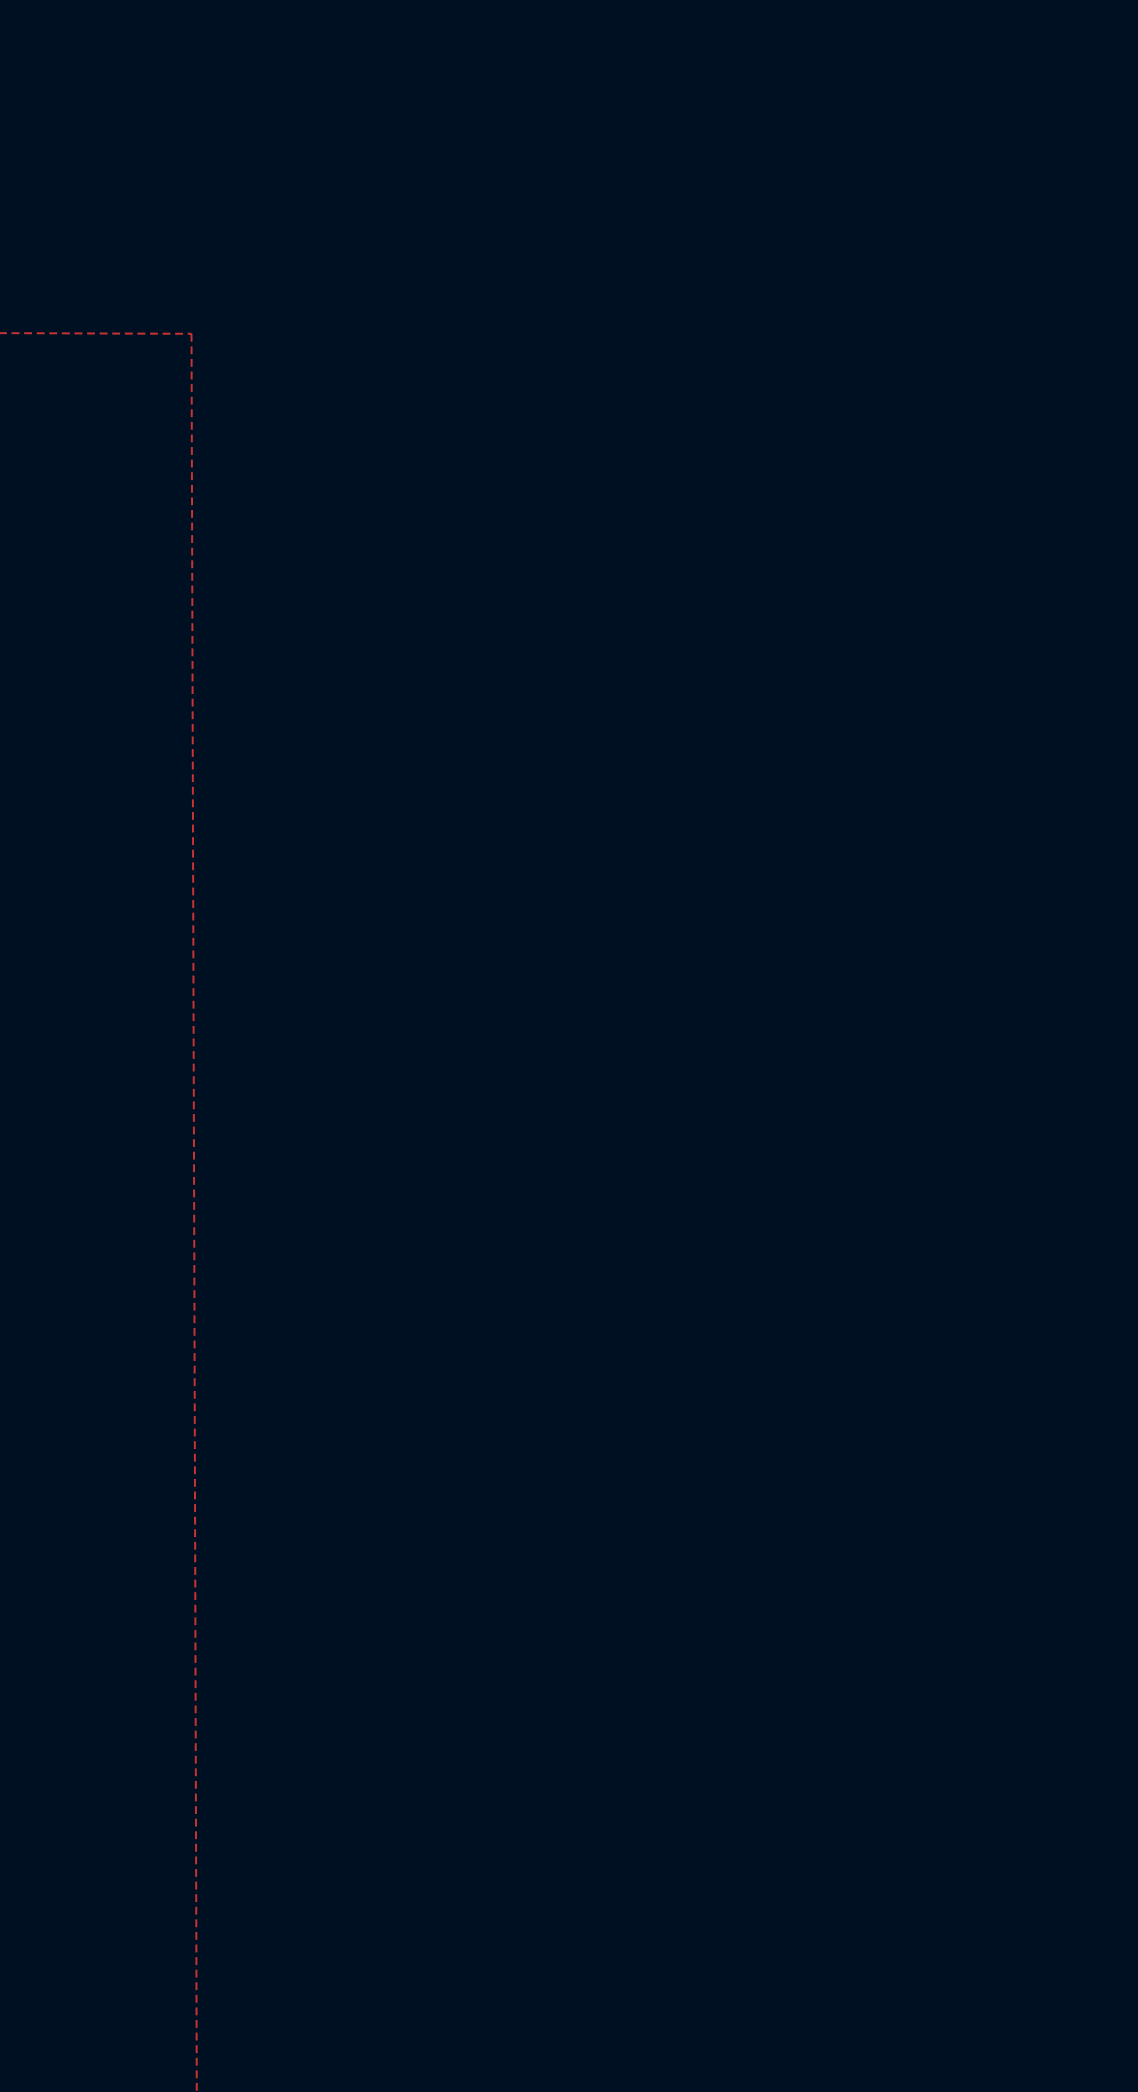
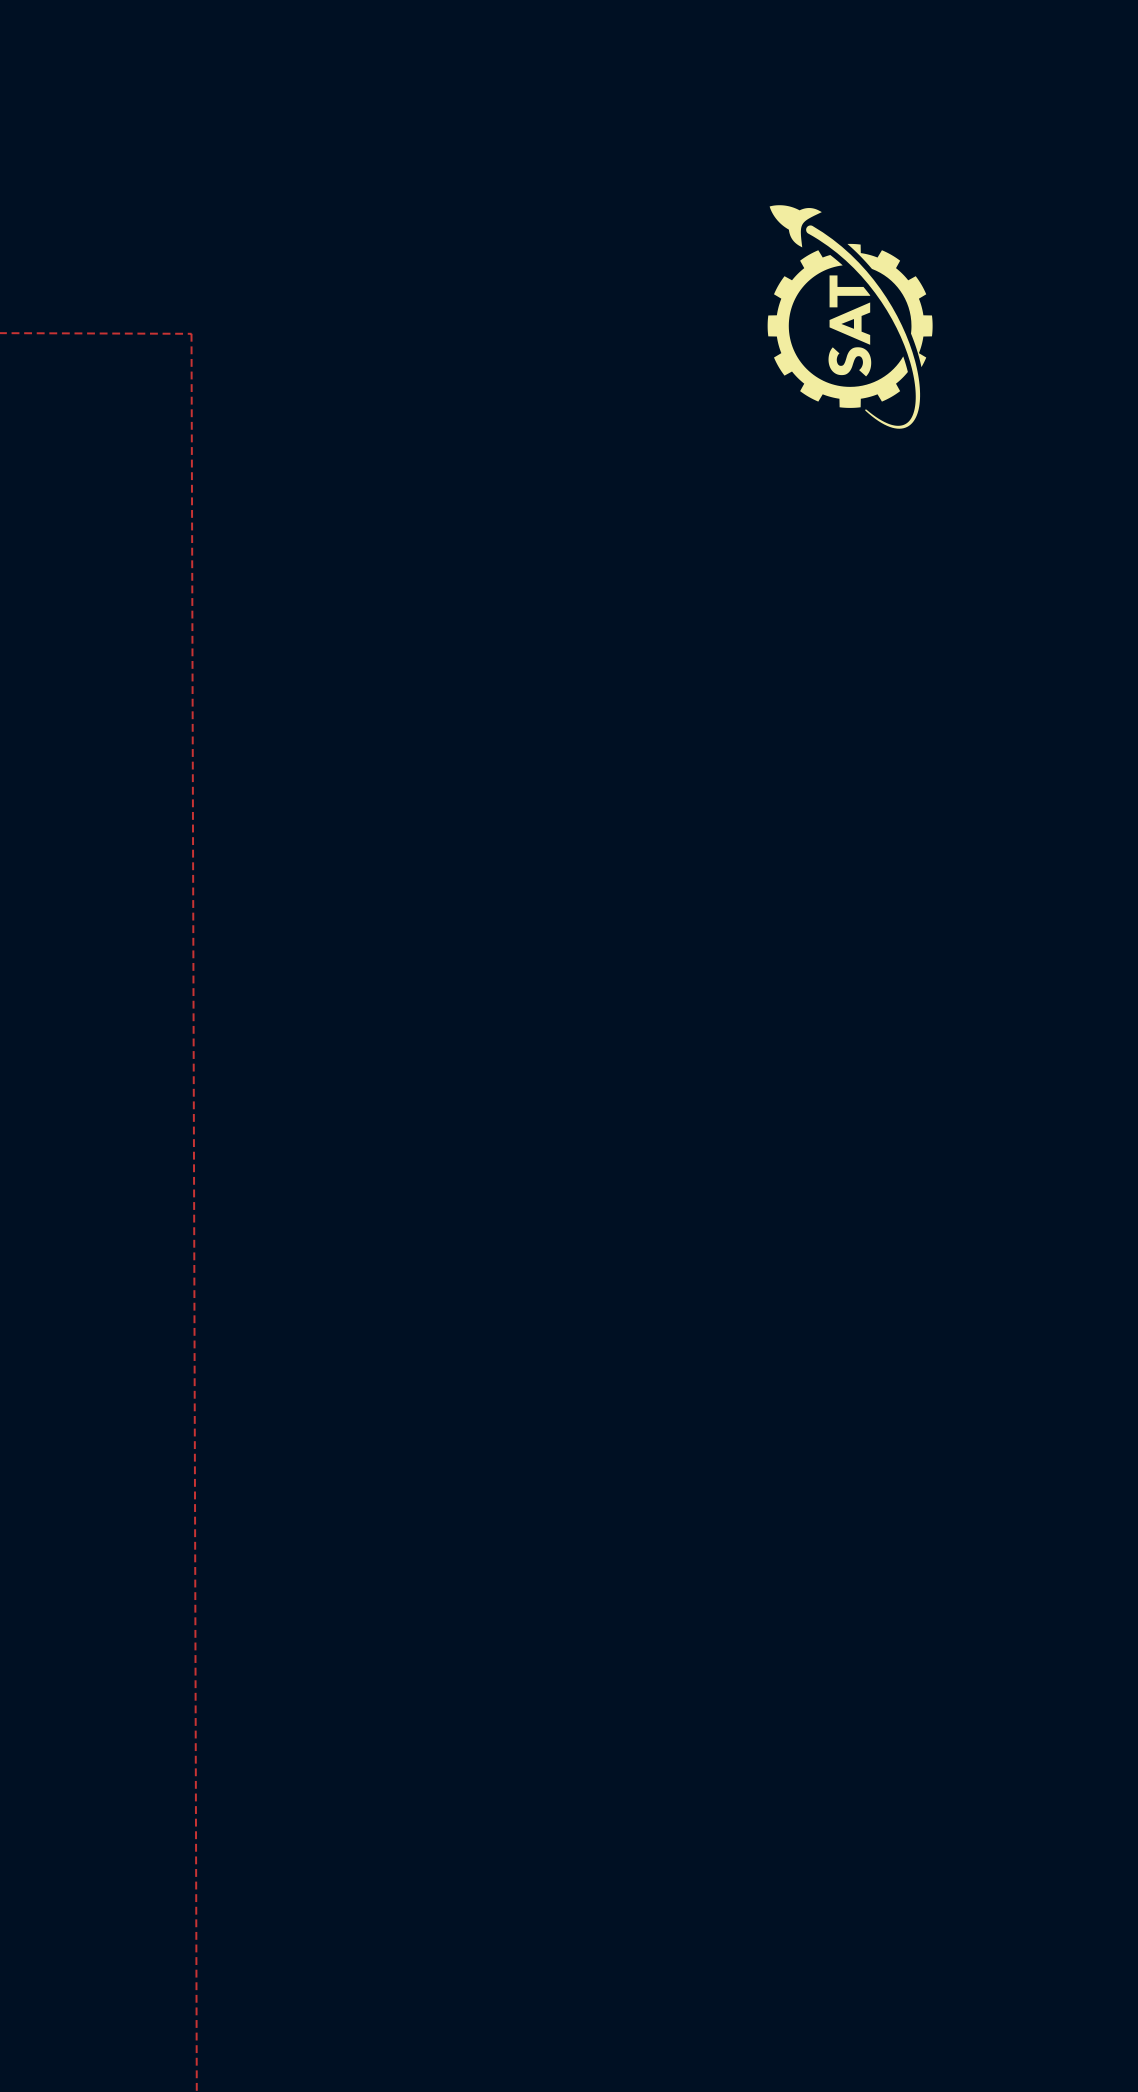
drawing: none -> [767, 205, 933, 429]

